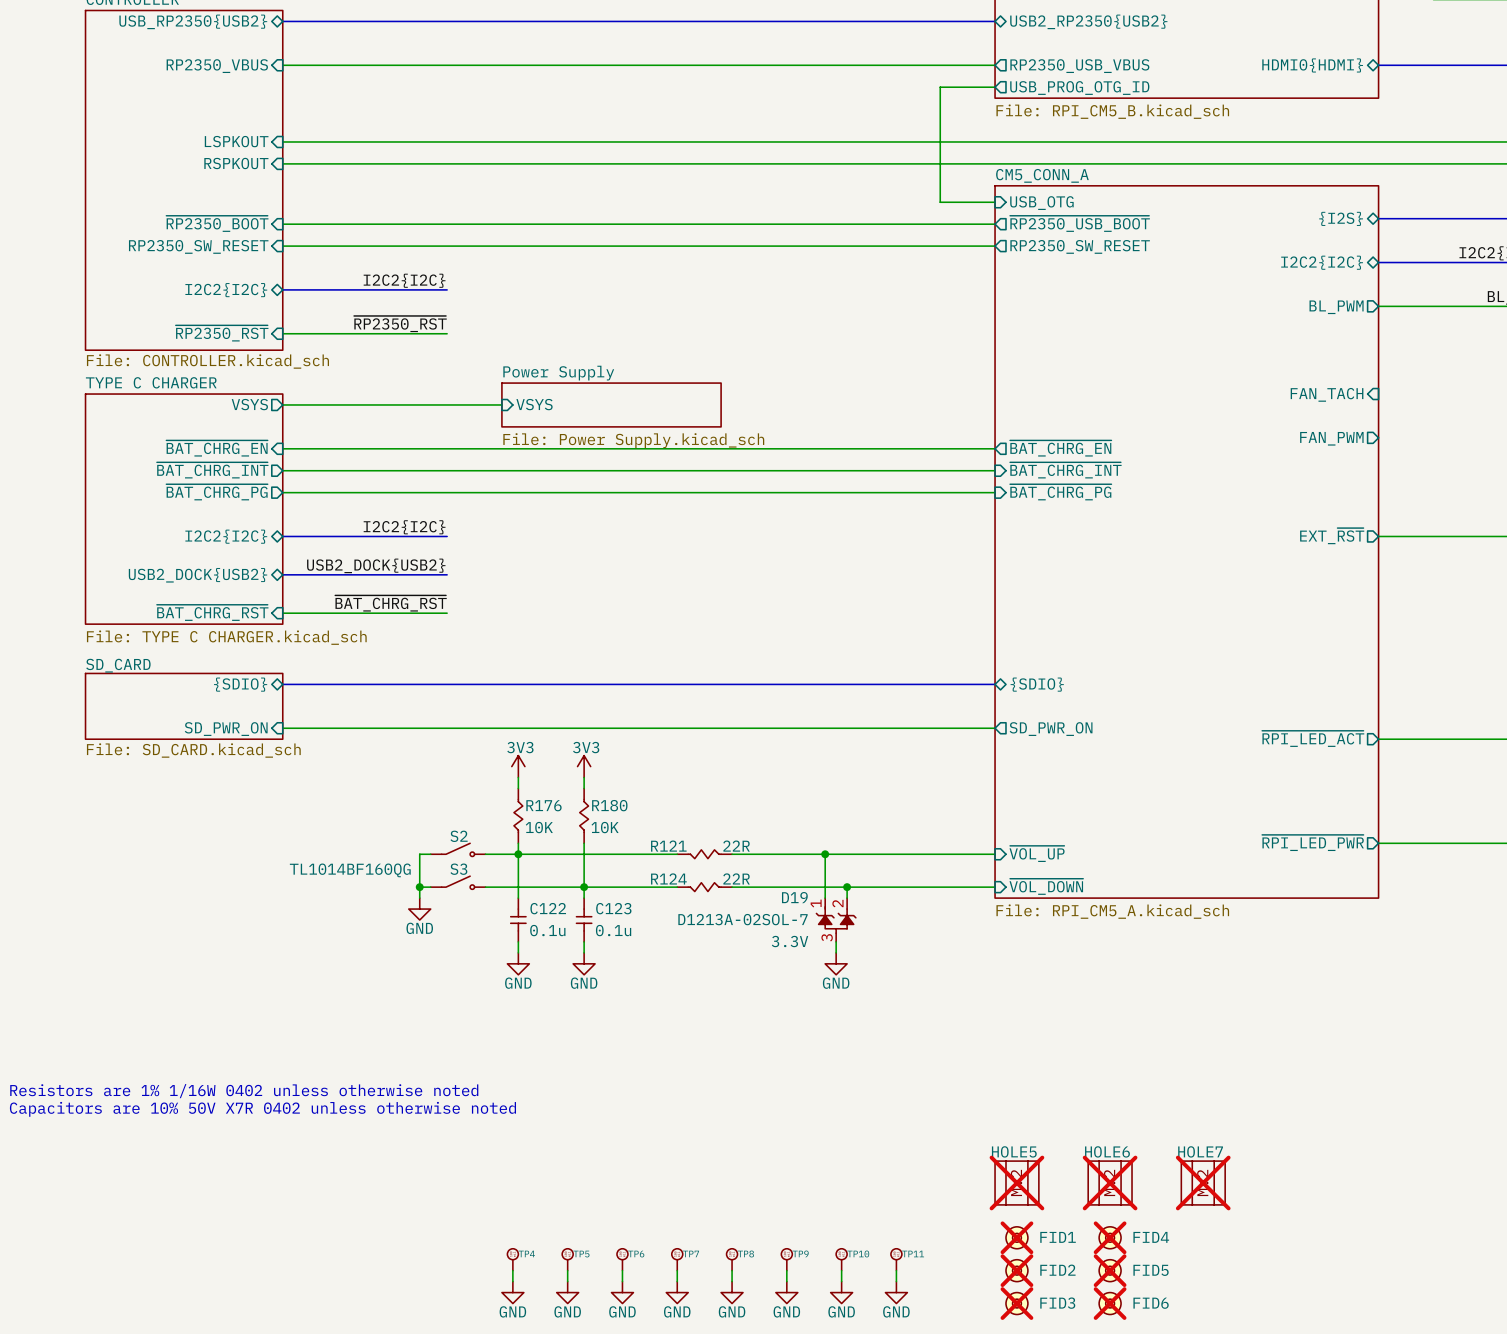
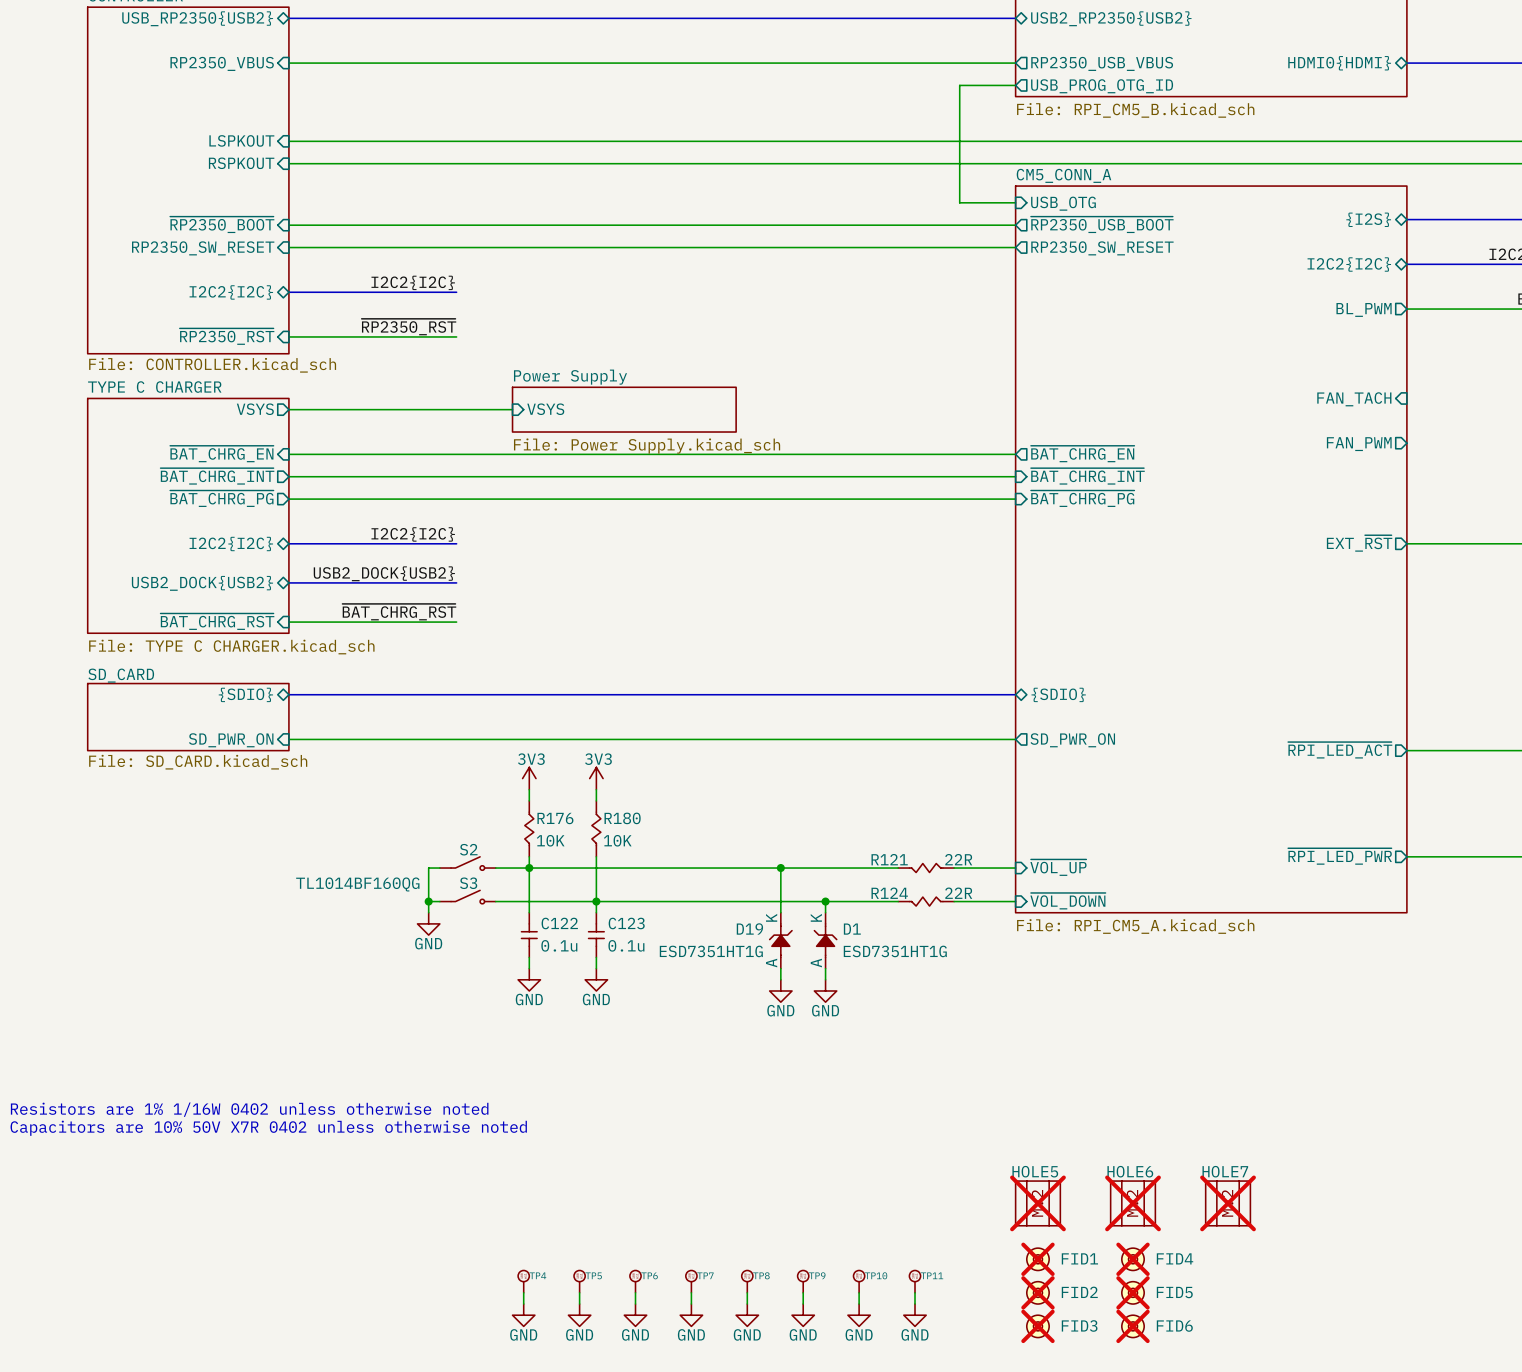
R121 position: (704, 854) -> (926, 868)
junction: none -> (780, 868)
wire: (825, 854) (825, 898) -> (780, 868) (780, 912)
junction: (825, 854) -> none
R124 position: (704, 887) -> (926, 901)
junction: none -> (825, 901)
wire: (847, 887) (847, 898) -> (825, 901) (825, 912)
junction: (847, 887) -> none
D19 symbol: [816, 898, 856, 942] -> [769, 912, 793, 969]
D19 value: D1213A-02SOL-7 (743, 919) -> ESD7351HT1G (711, 951)
D1: none -> ESD7351HT1G (825, 940)
D19 text: 3.3V (790, 941) -> none
wire: (836, 941) (836, 952) -> (825, 968) (825, 979)
wire: none -> (780, 968) (780, 979)
power symbol position: GND (836, 963) -> GND (825, 990)
power symbol: none -> GND (780, 990)

